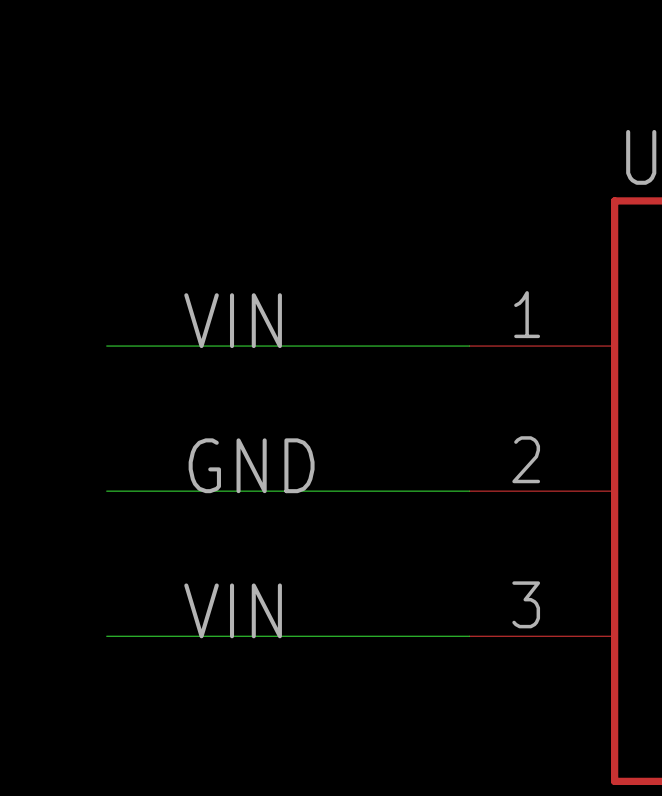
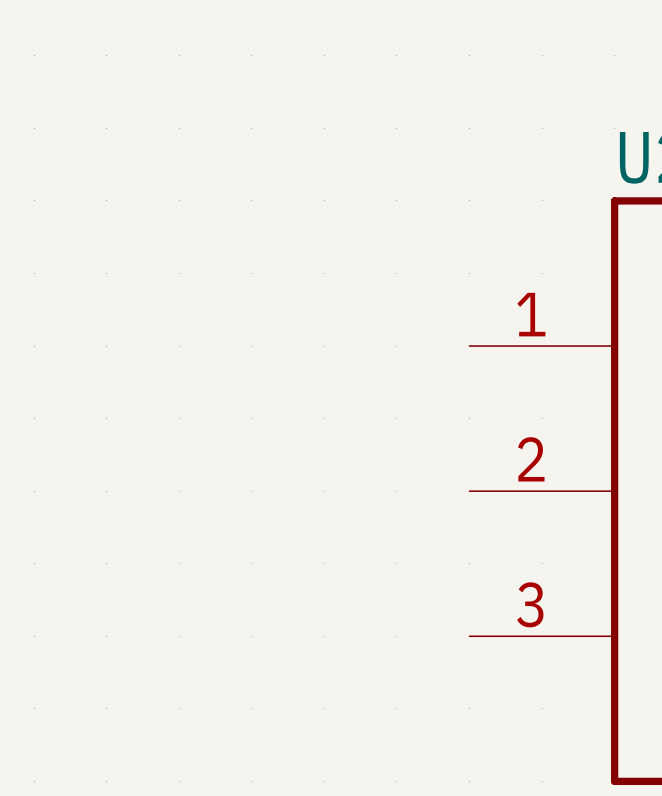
label: VIN (233, 320) -> none
wire: (106, 346) (469, 346) -> none
label: GND (251, 465) -> none
wire: (106, 491) (469, 491) -> none
label: VIN (233, 610) -> none
wire: (106, 636) (469, 636) -> none

